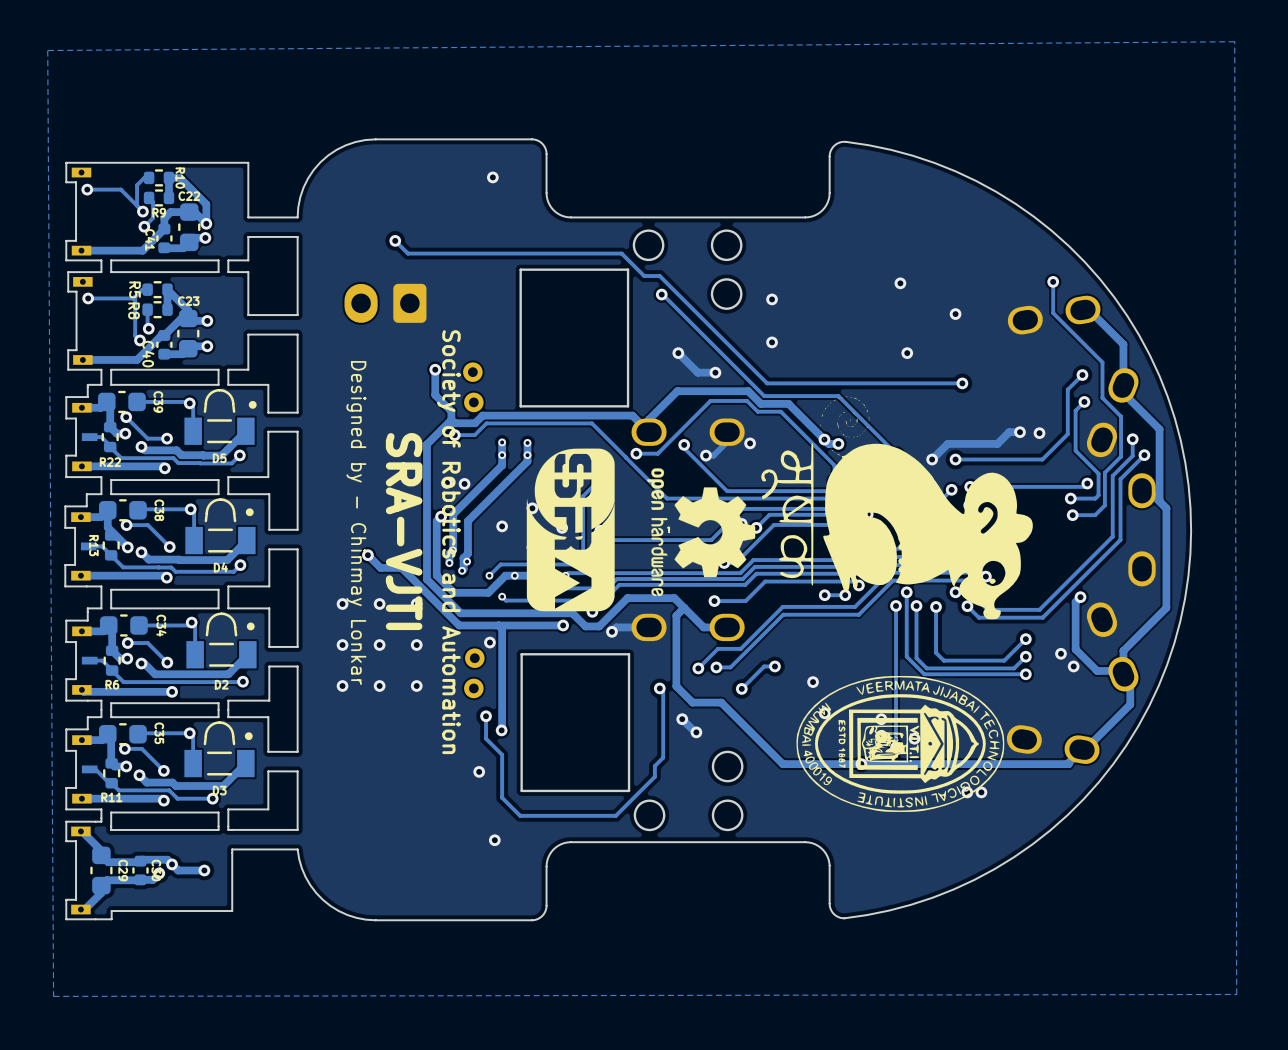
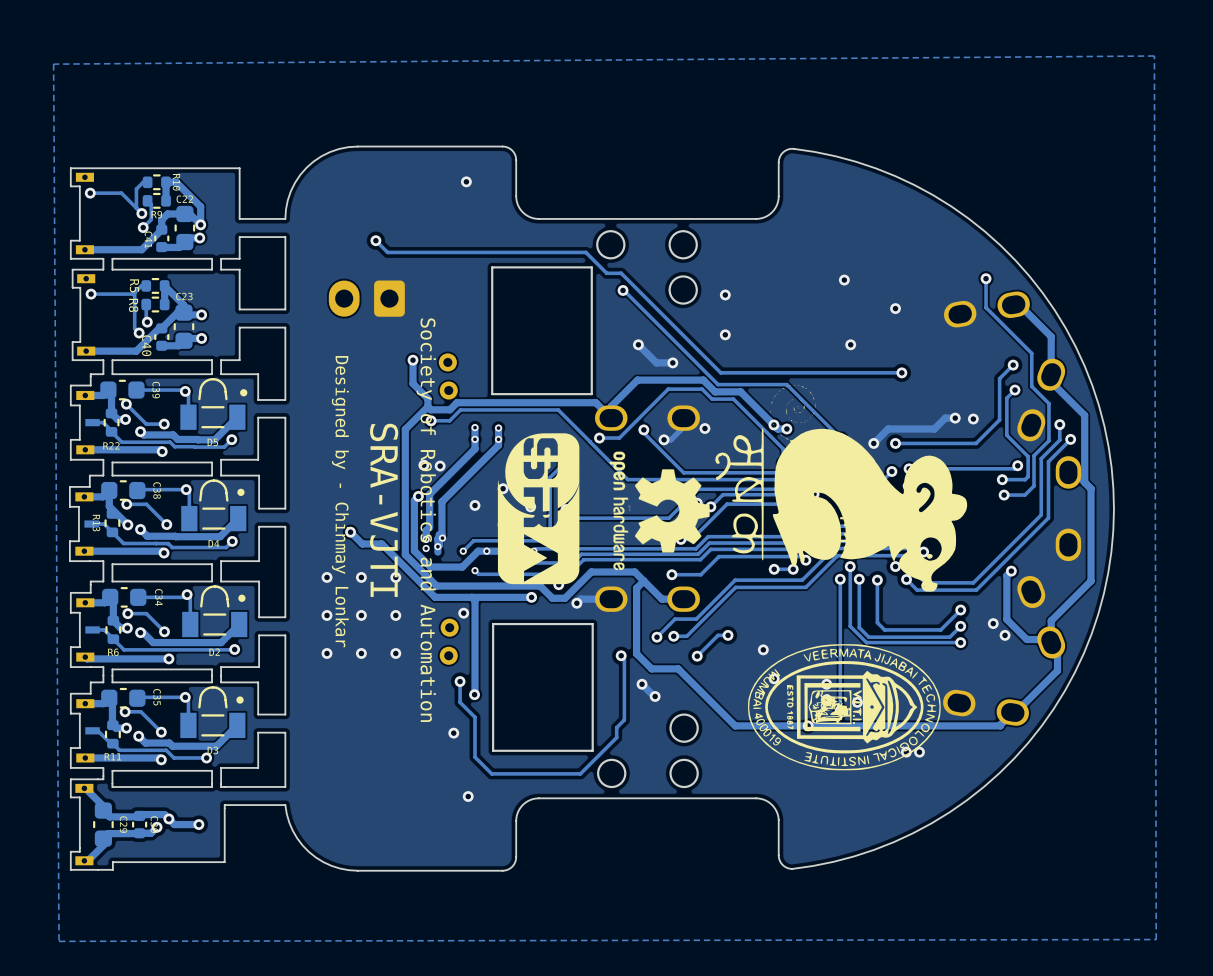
track: (467, 521) (467, 553) (463, 558) -> (443, 500) (441, 534) (437, 538) (437, 552)
via position: (452, 550) -> (426, 548)

